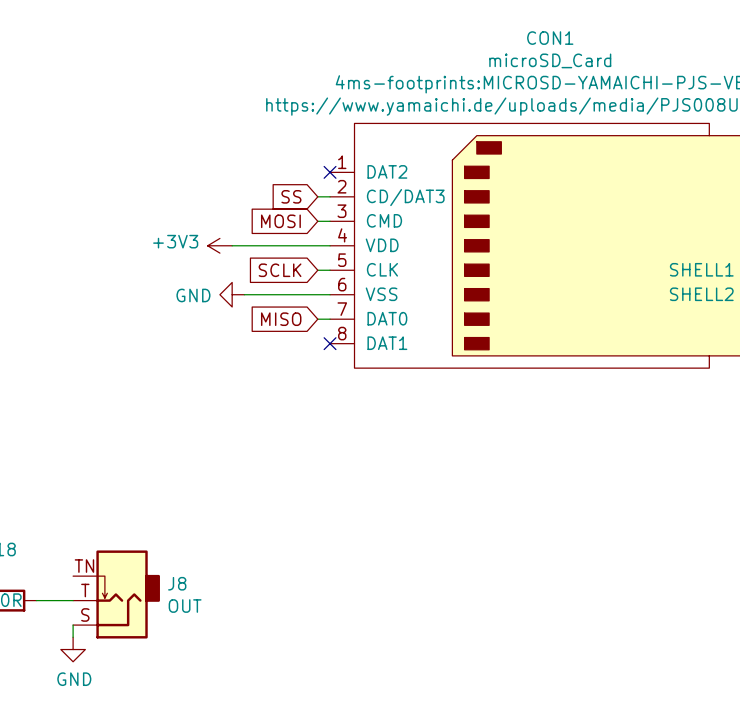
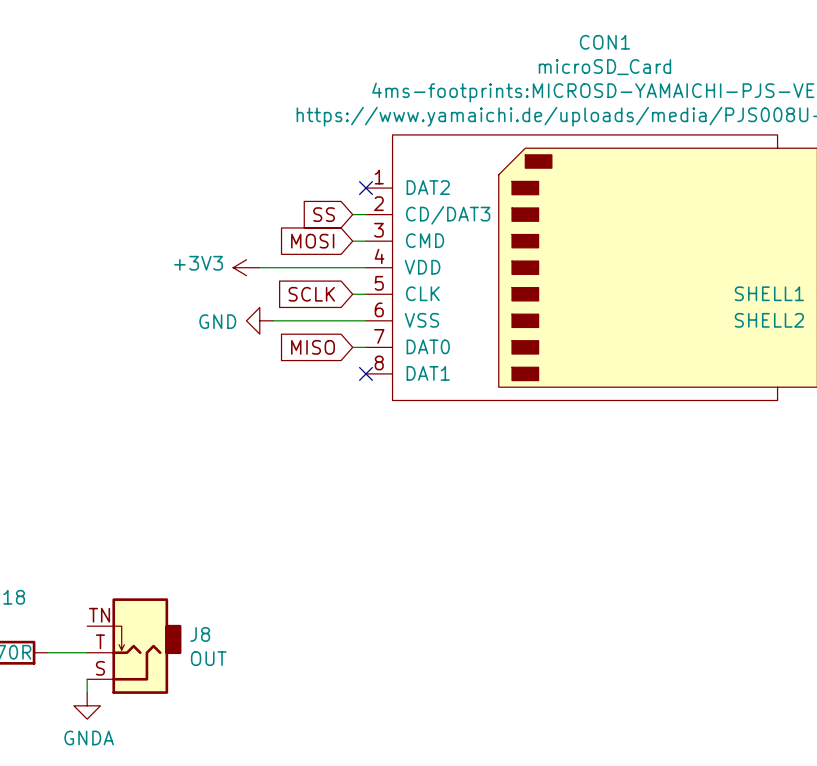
power symbol: GND (73, 649) -> GNDA (87, 705)

